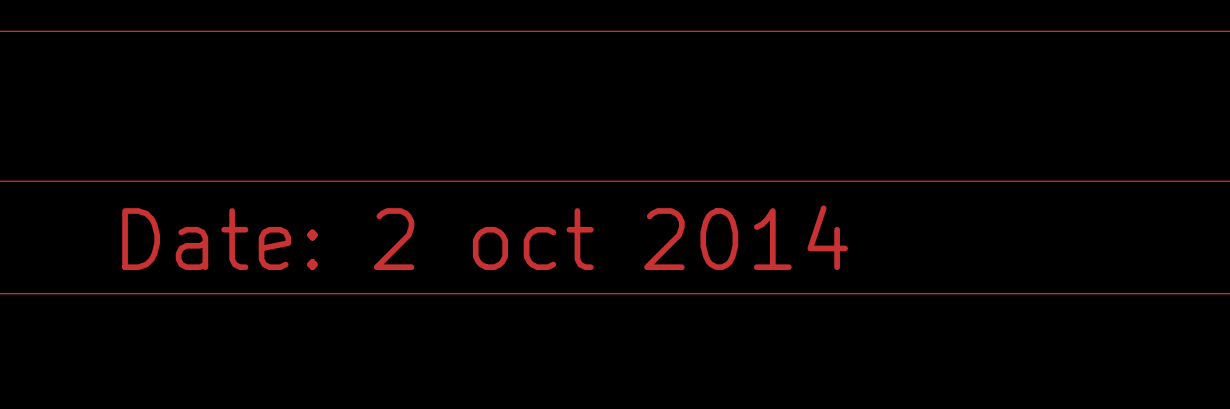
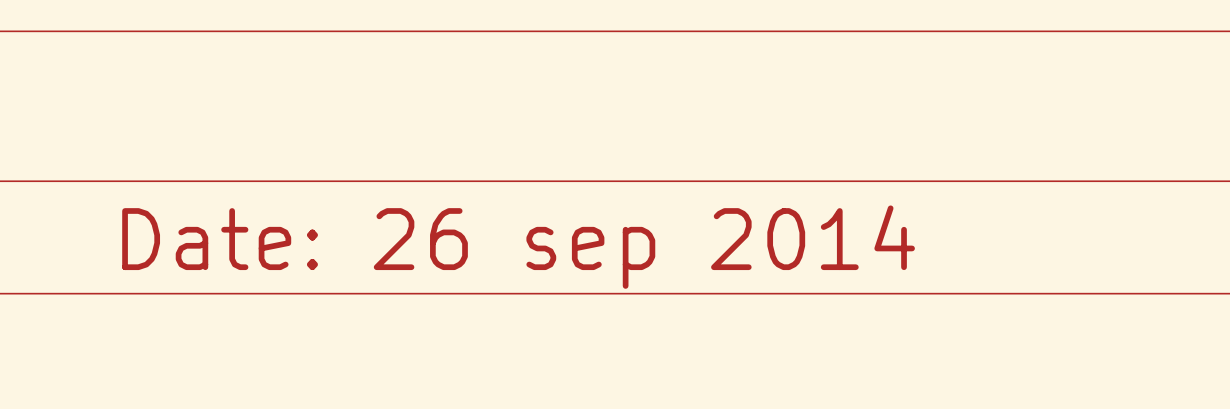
title block: Date: 2 oct 2014 (485, 237) -> Date: 26 sep 2014 (518, 247)

